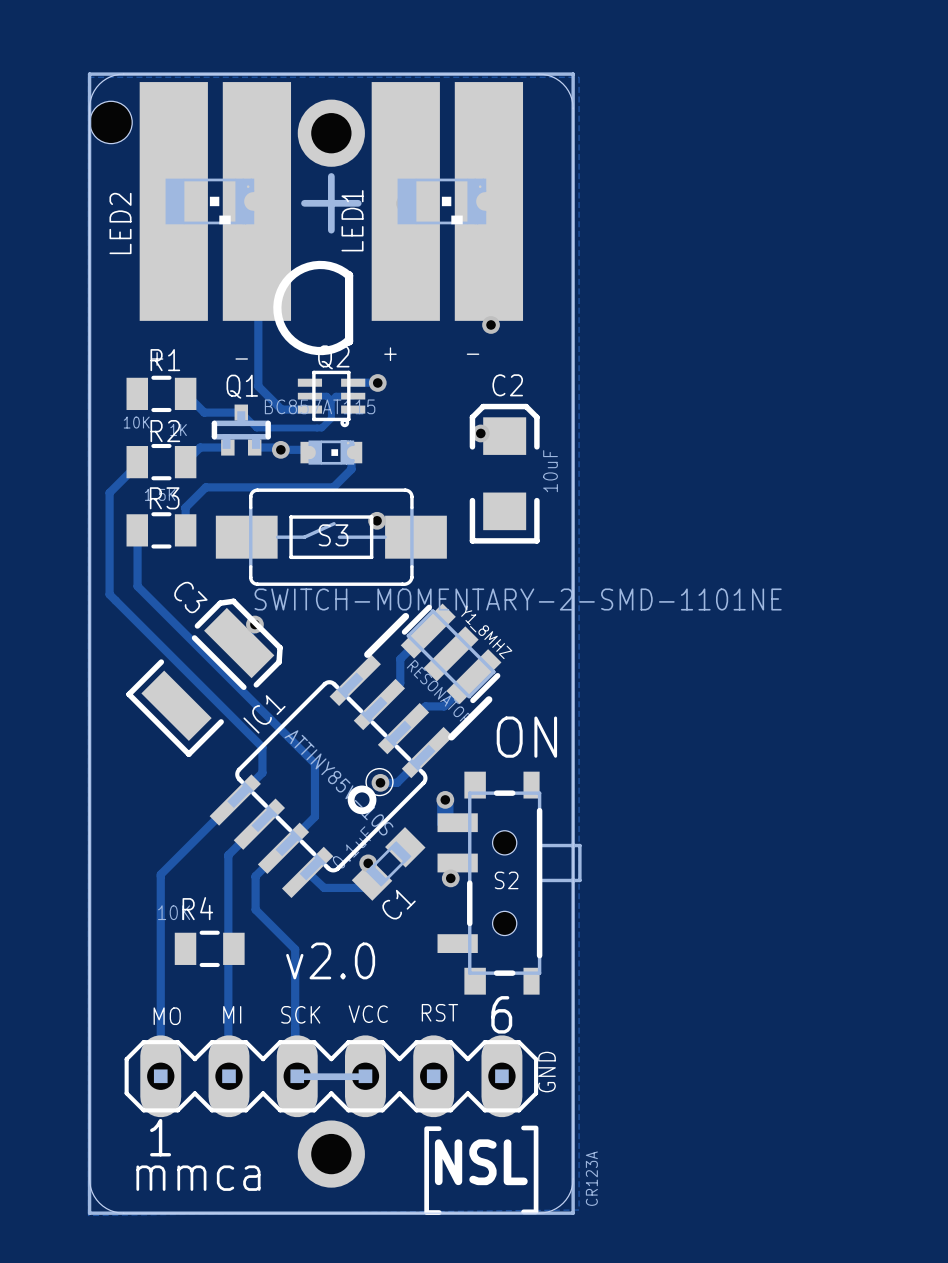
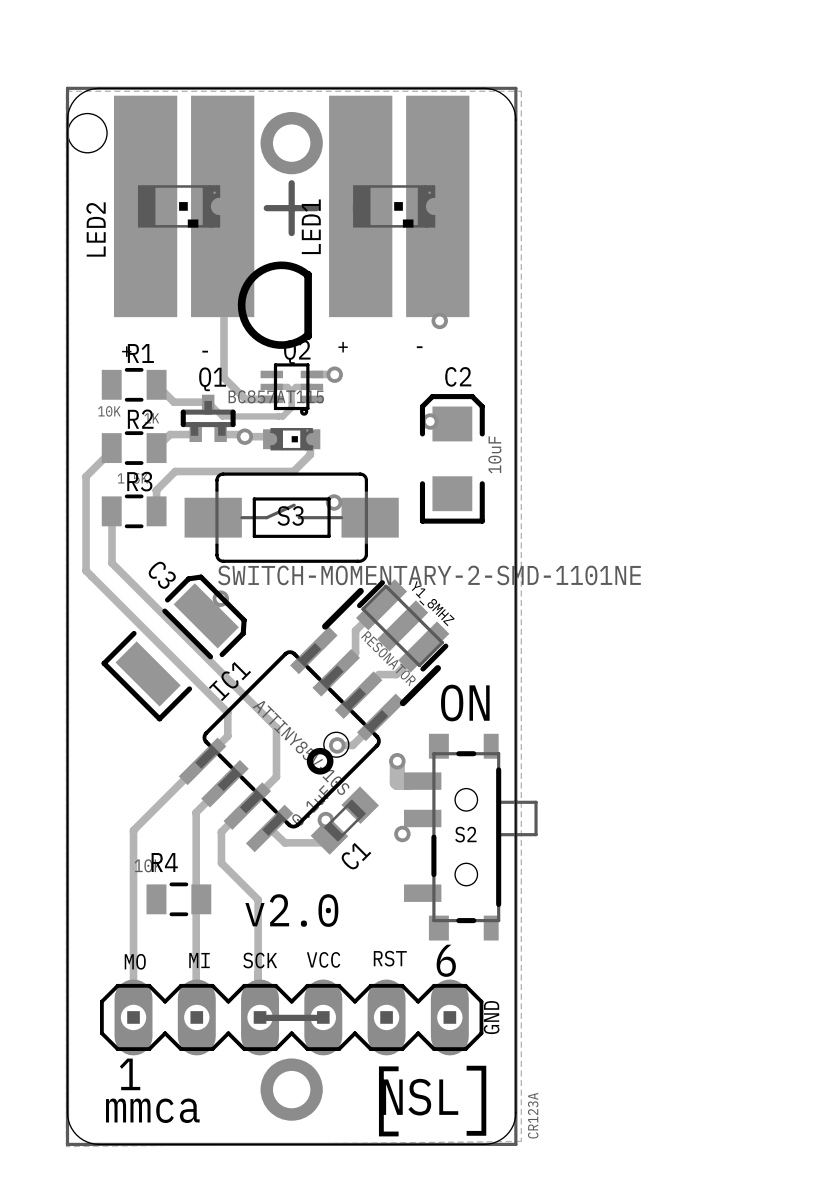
S2 position: (509, 883) -> (470, 837)

